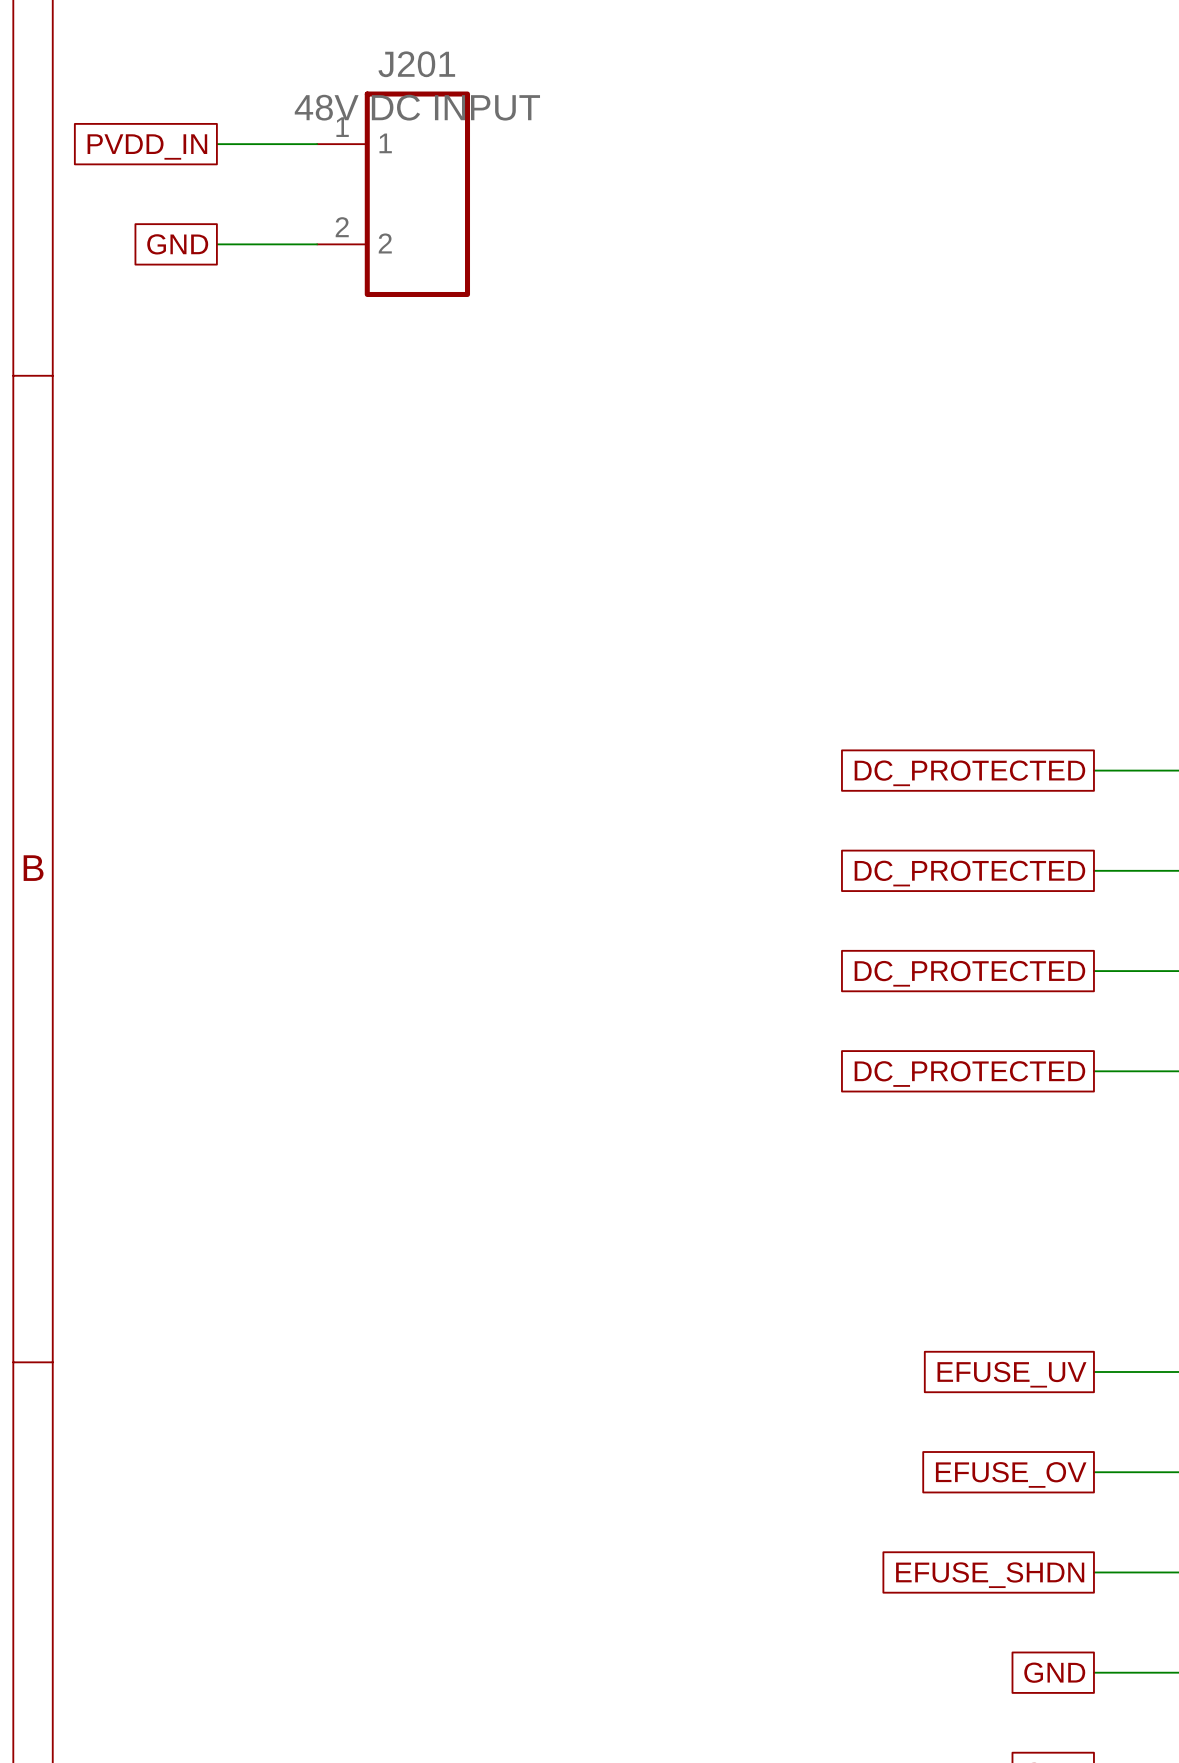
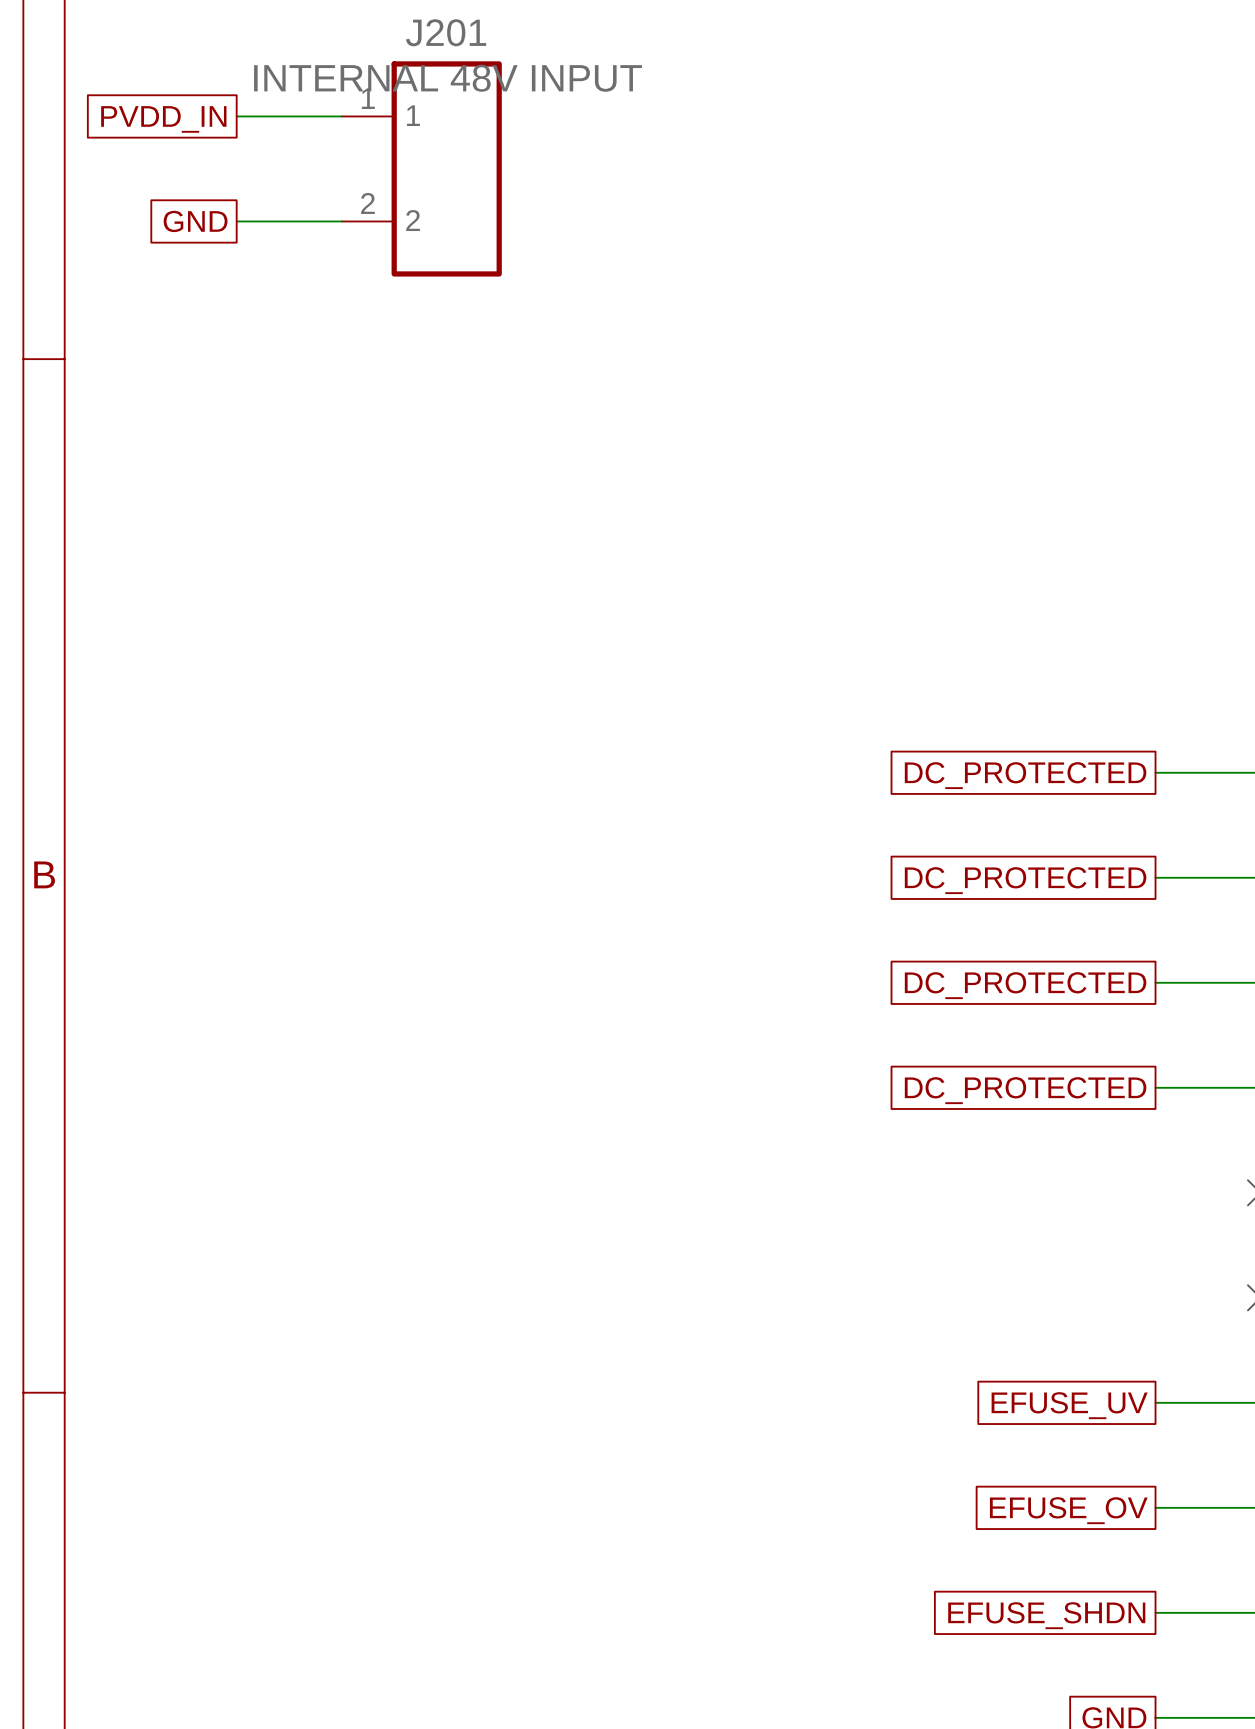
J201 value: 48V DC INPUT (417, 107) -> INTERNAL 48V INPUT (448, 78)

